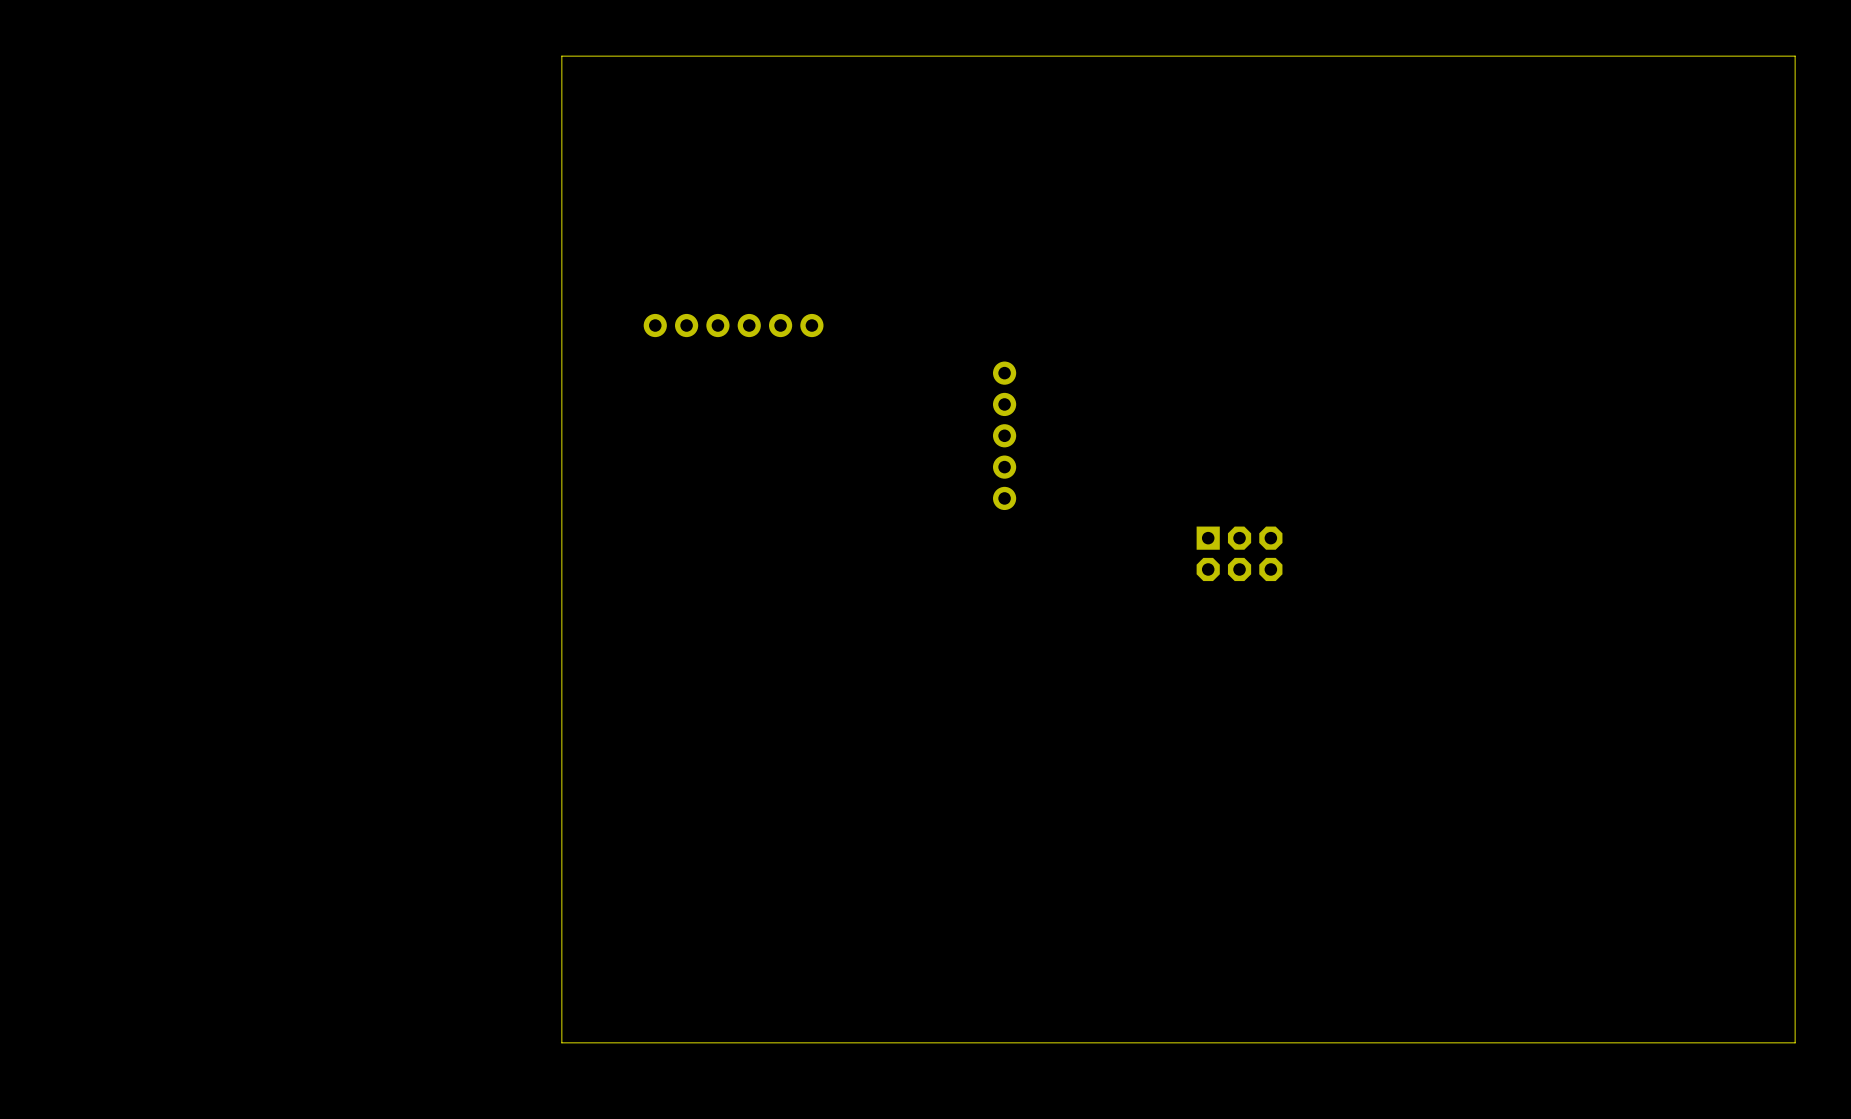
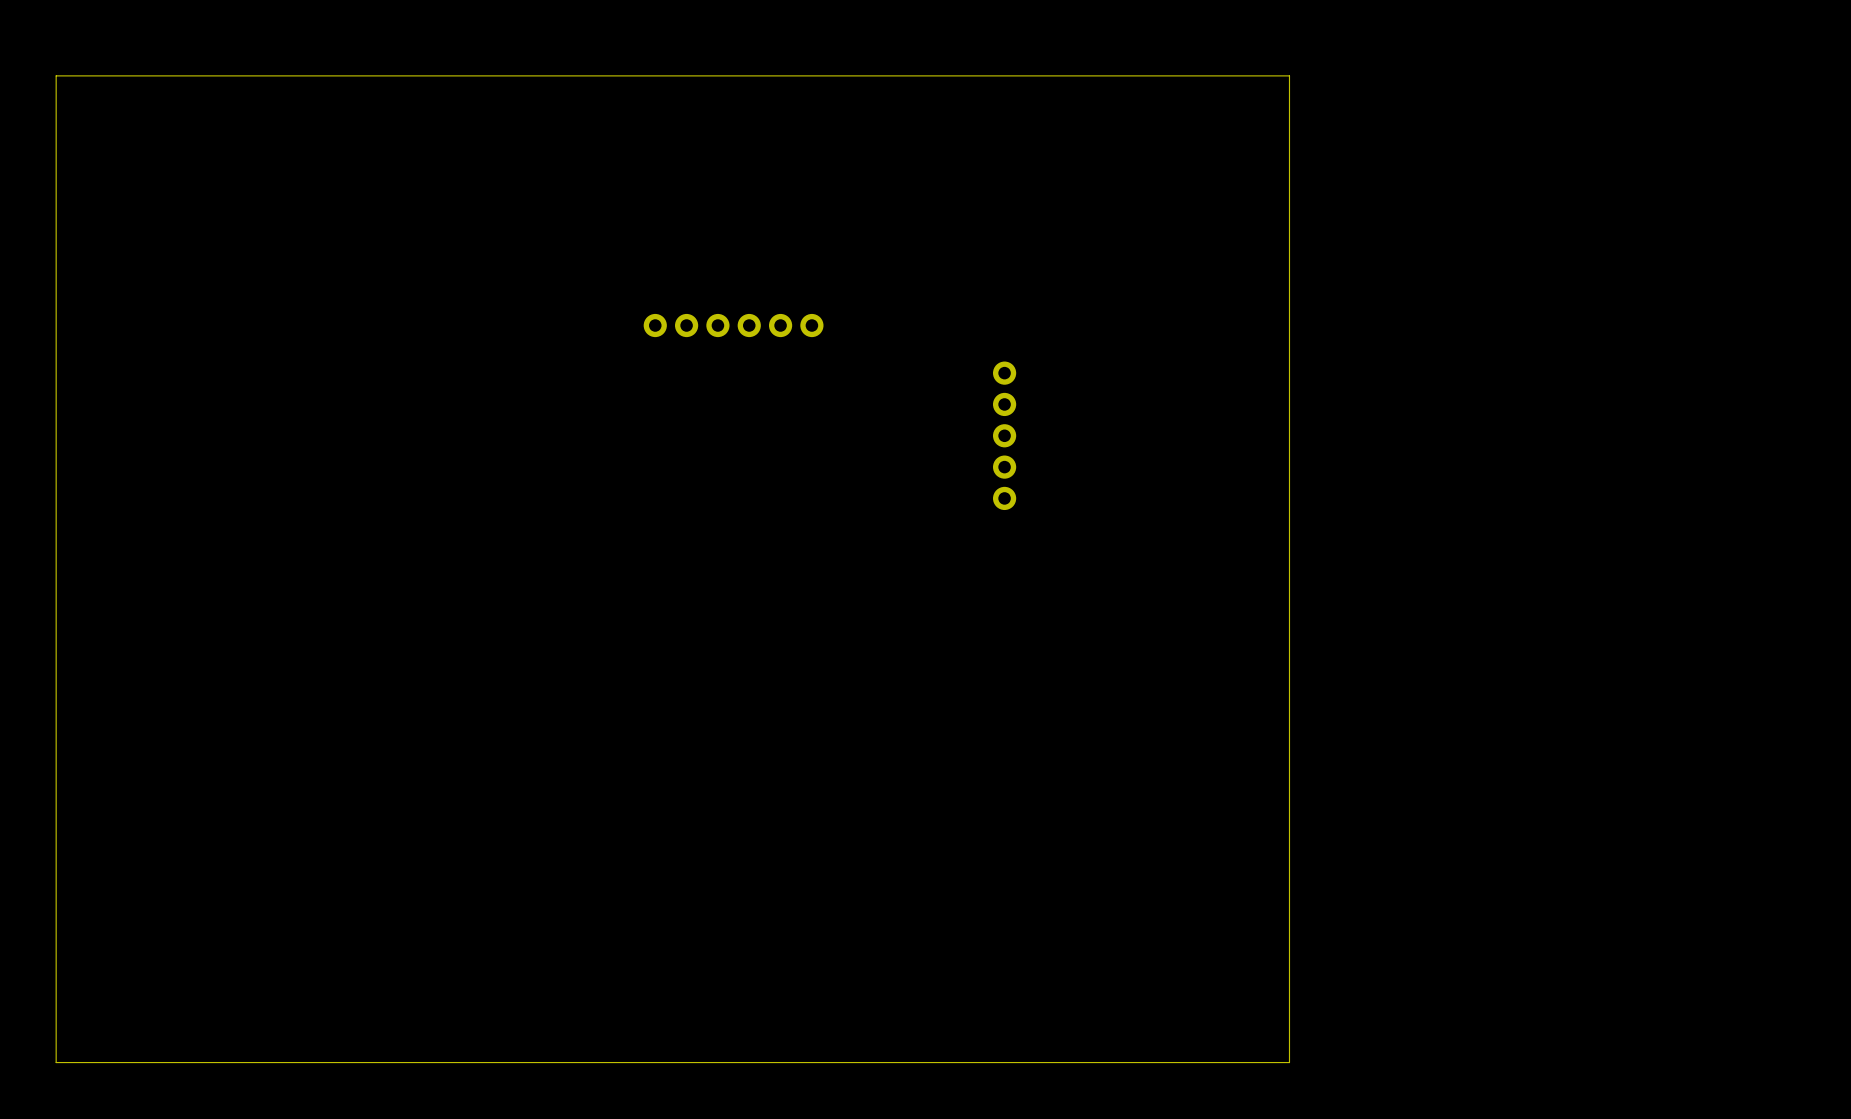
board edge: (1795, 56) (561, 56) (561, 1042) (1795, 1042) (1795, 56) -> none
board edge: none -> (1289, 75) (56, 75) (56, 1062) (1289, 1062) (1289, 75)
part: (1239, 553) -> none

